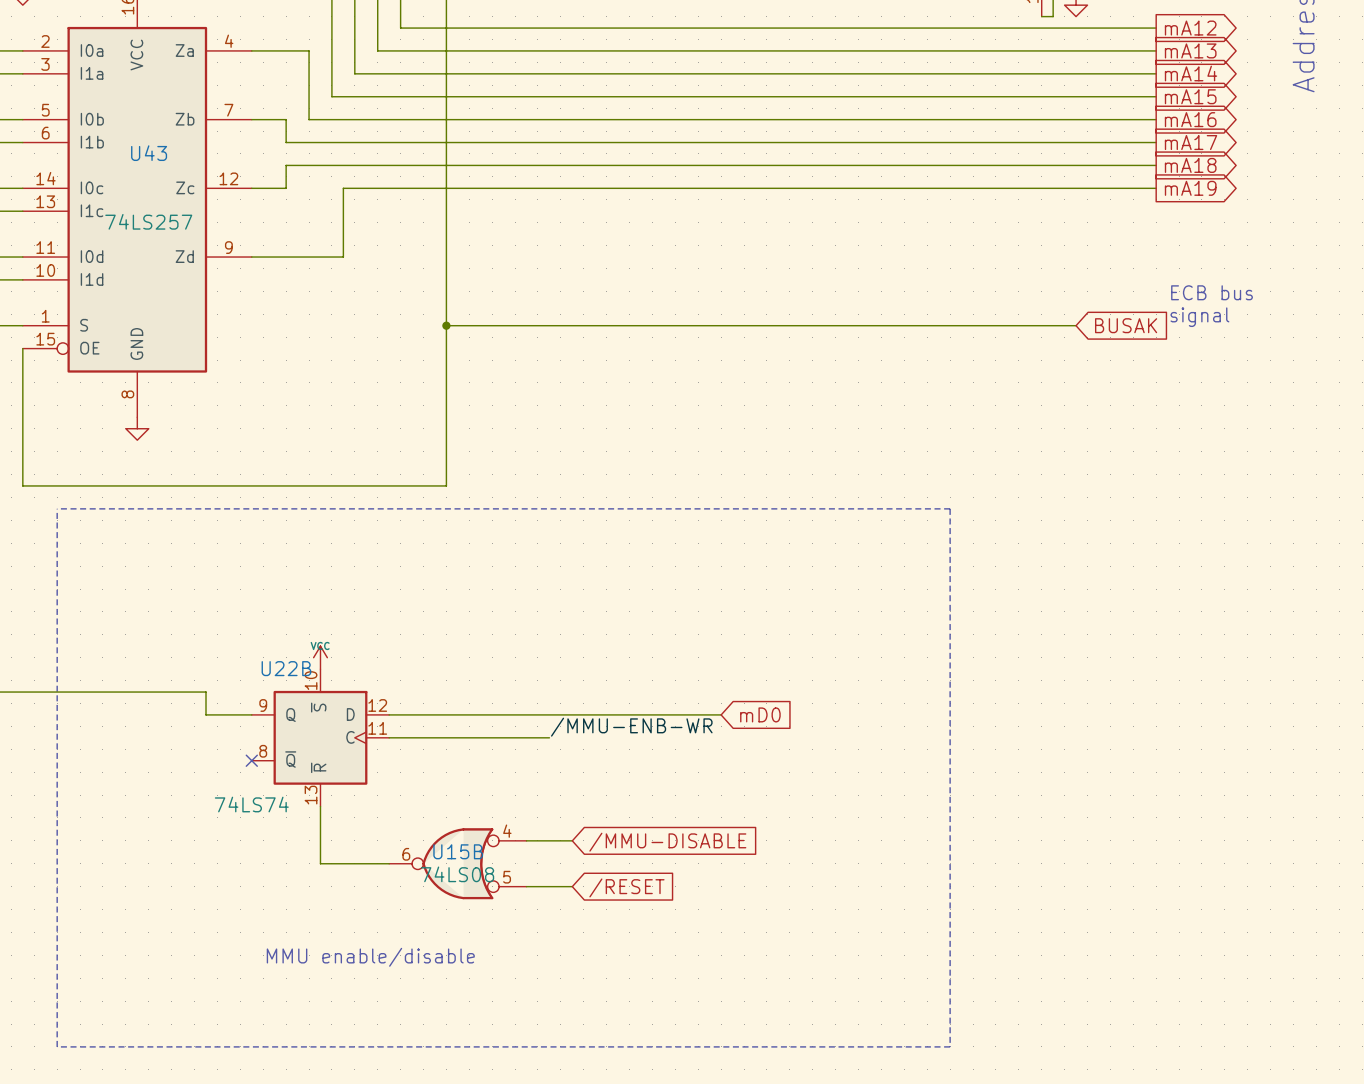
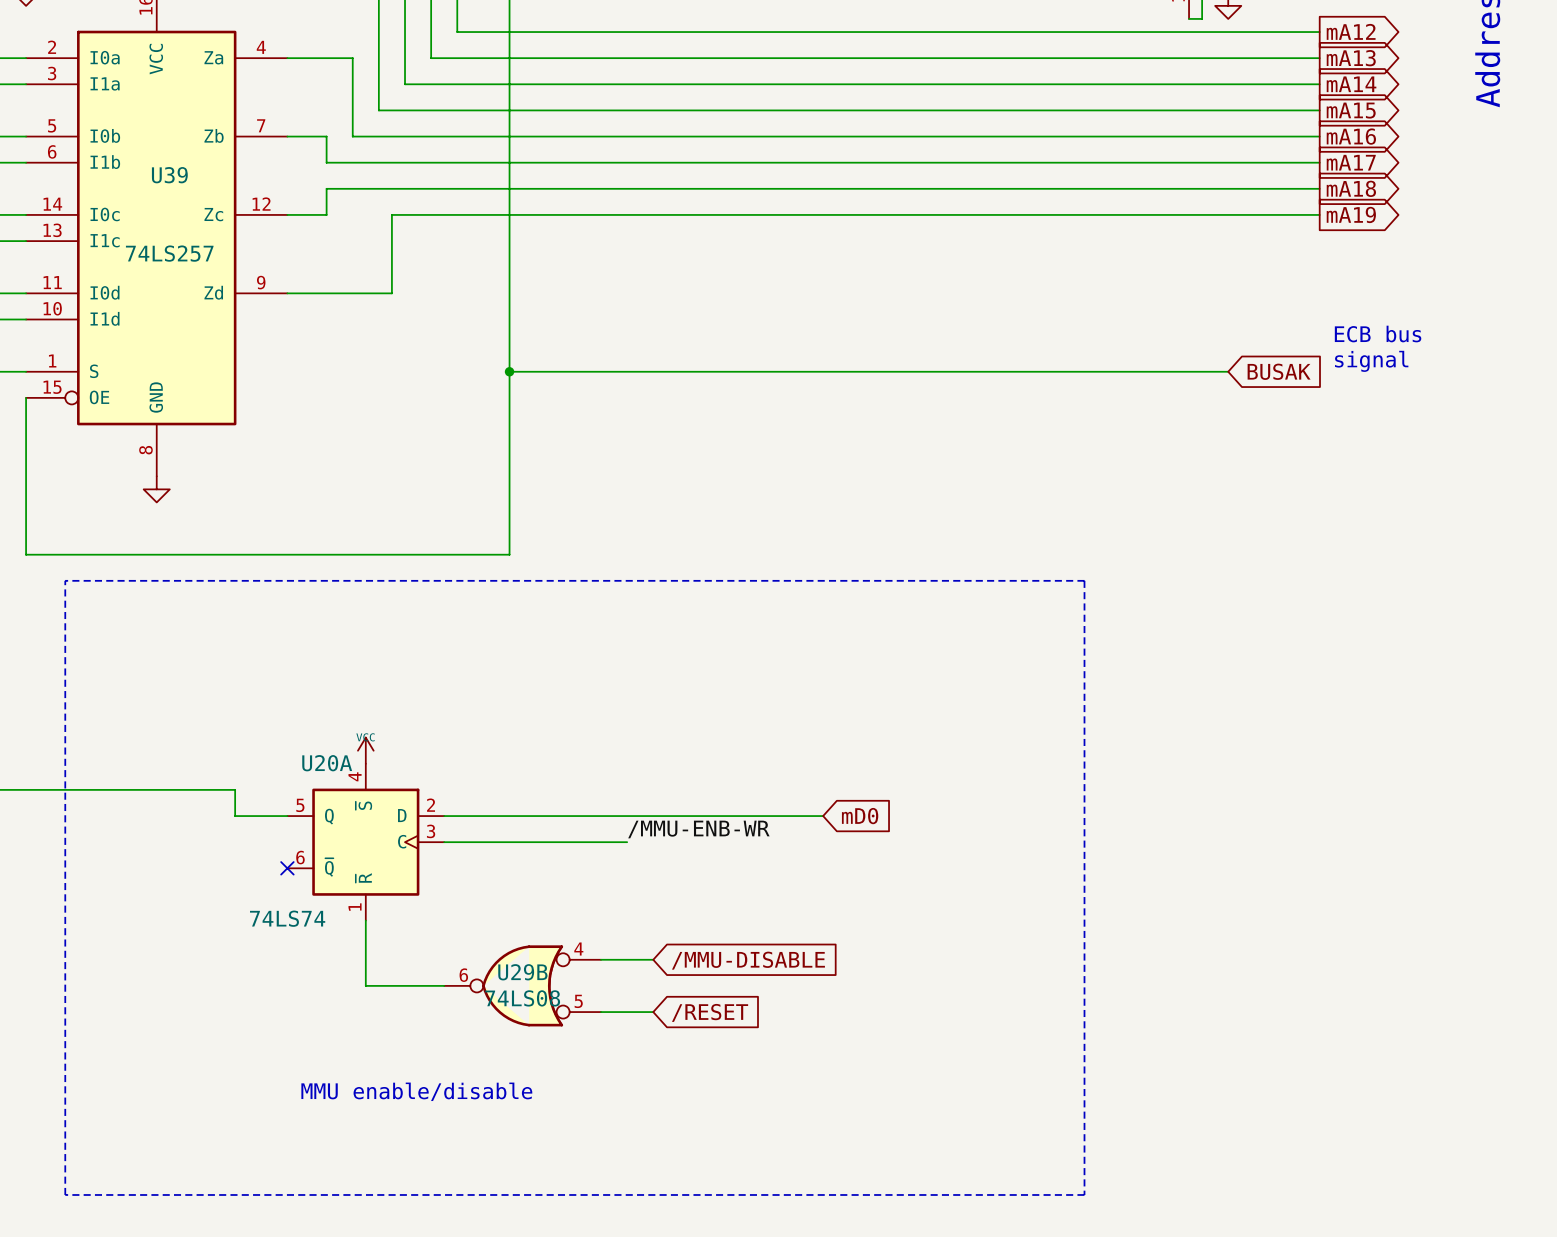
U43 name: U43 (149, 153) -> U39 (169, 175)
U22B name: U22B (286, 668) -> U20A (327, 763)
U22B pin number: 10 (311, 680) -> 4 (355, 776)
U22B pin number: 9 (263, 705) -> 5 (300, 805)
U22B pin number: 12 (377, 705) -> 2 (431, 805)
U22B pin number: 11 (377, 728) -> 3 (431, 831)
U22B pin number: 8 (263, 751) -> 6 (300, 857)
U22B pin number: 13 (311, 795) -> 1 (355, 907)
U15B name: U15B (458, 851) -> U29B (522, 972)

